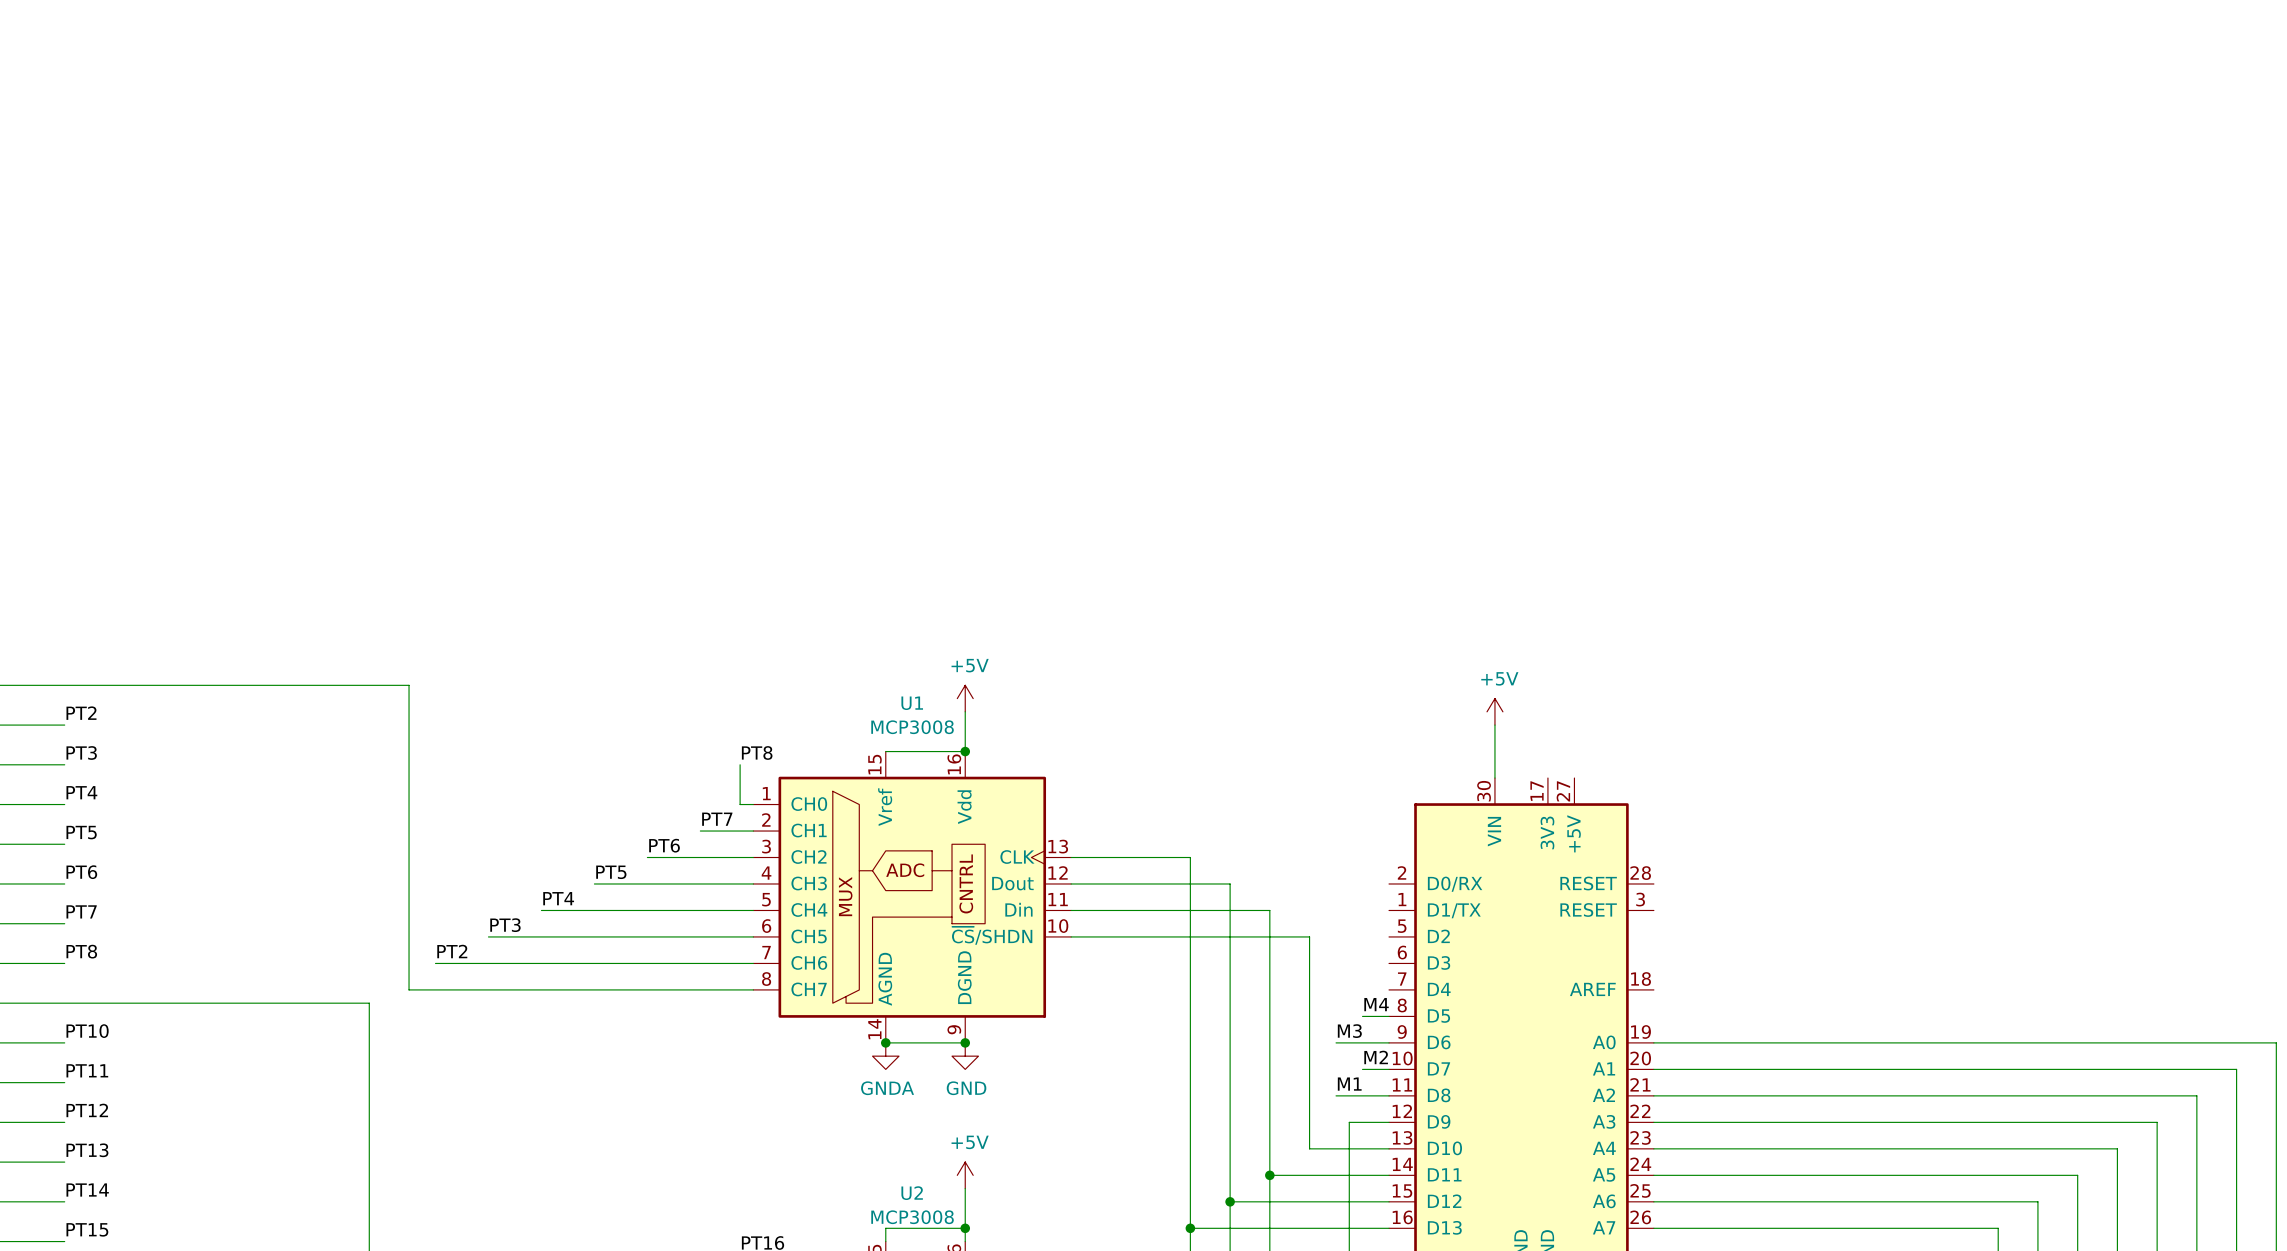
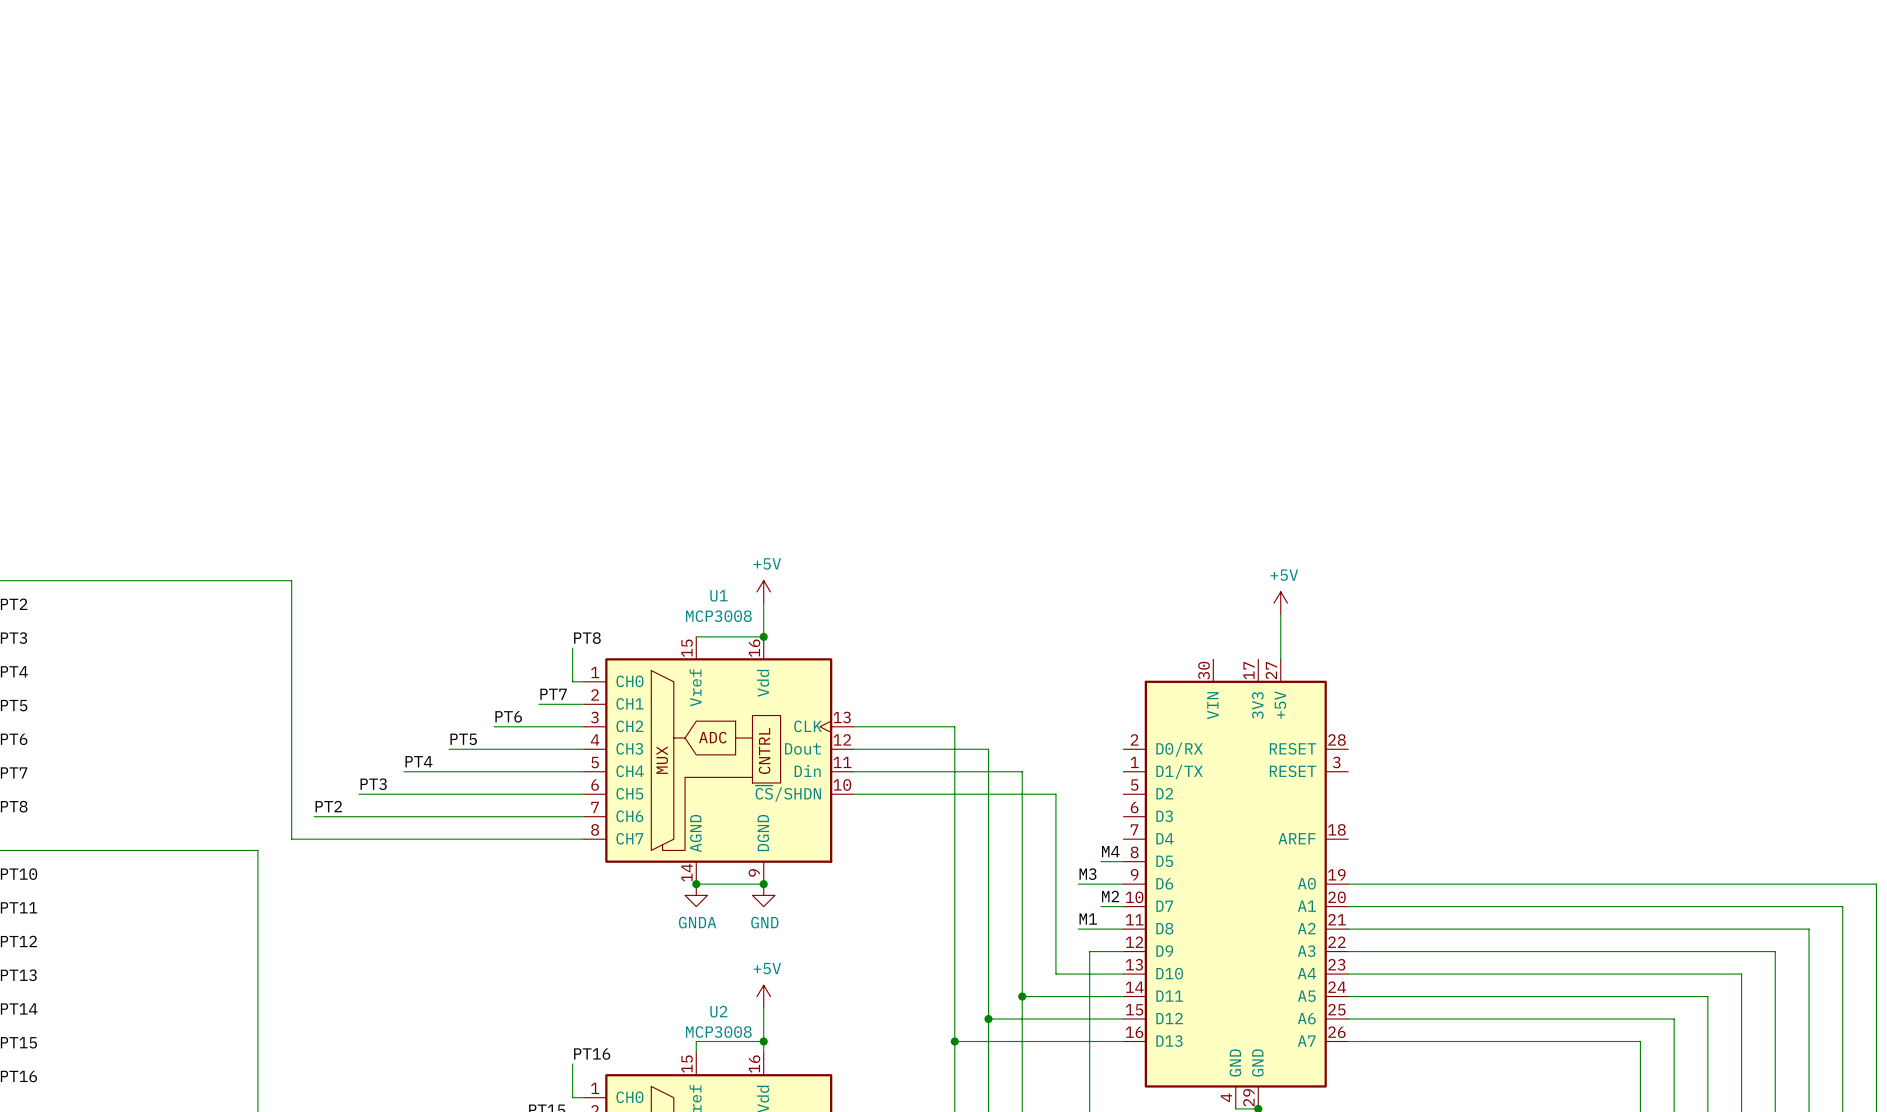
power symbol position: +5V (1494, 711) -> +5V (1280, 603)
wire: (1494, 725) (1494, 778) -> (1280, 614) (1280, 659)

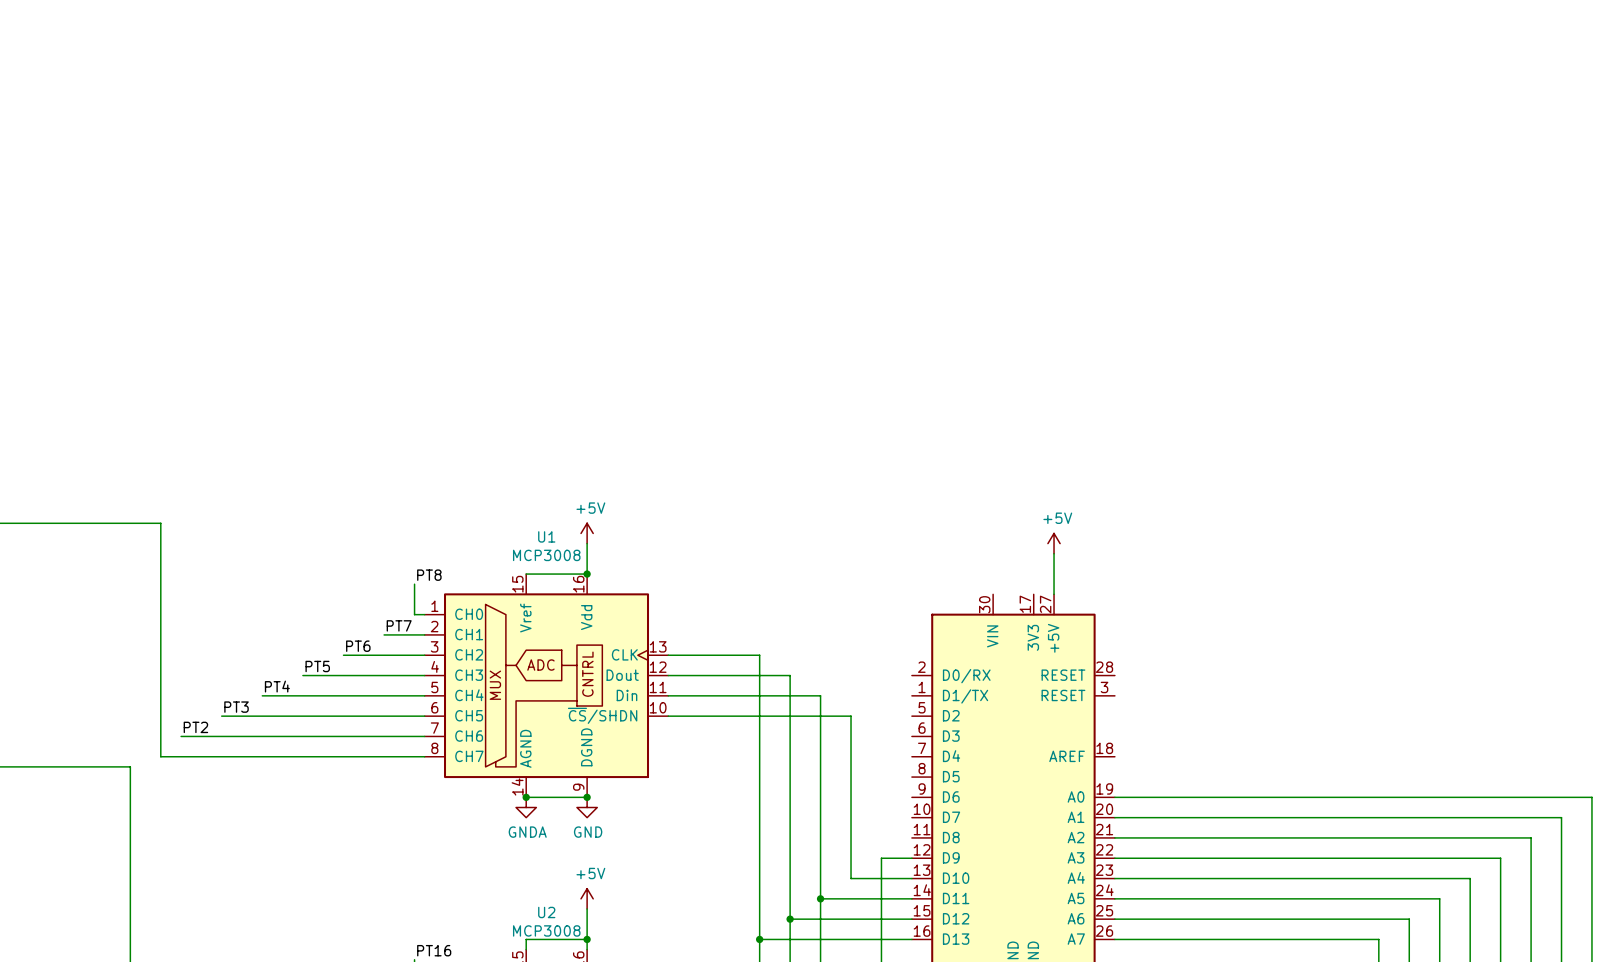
label: M4 (1110, 851) -> none
wire: (1100, 861) (1123, 861) -> none
label: M3 (1087, 874) -> none
wire: (1078, 884) (1123, 884) -> none
label: M2 (1110, 896) -> none
wire: (1100, 906) (1123, 906) -> none
label: M1 (1088, 919) -> none
wire: (1078, 929) (1123, 929) -> none

